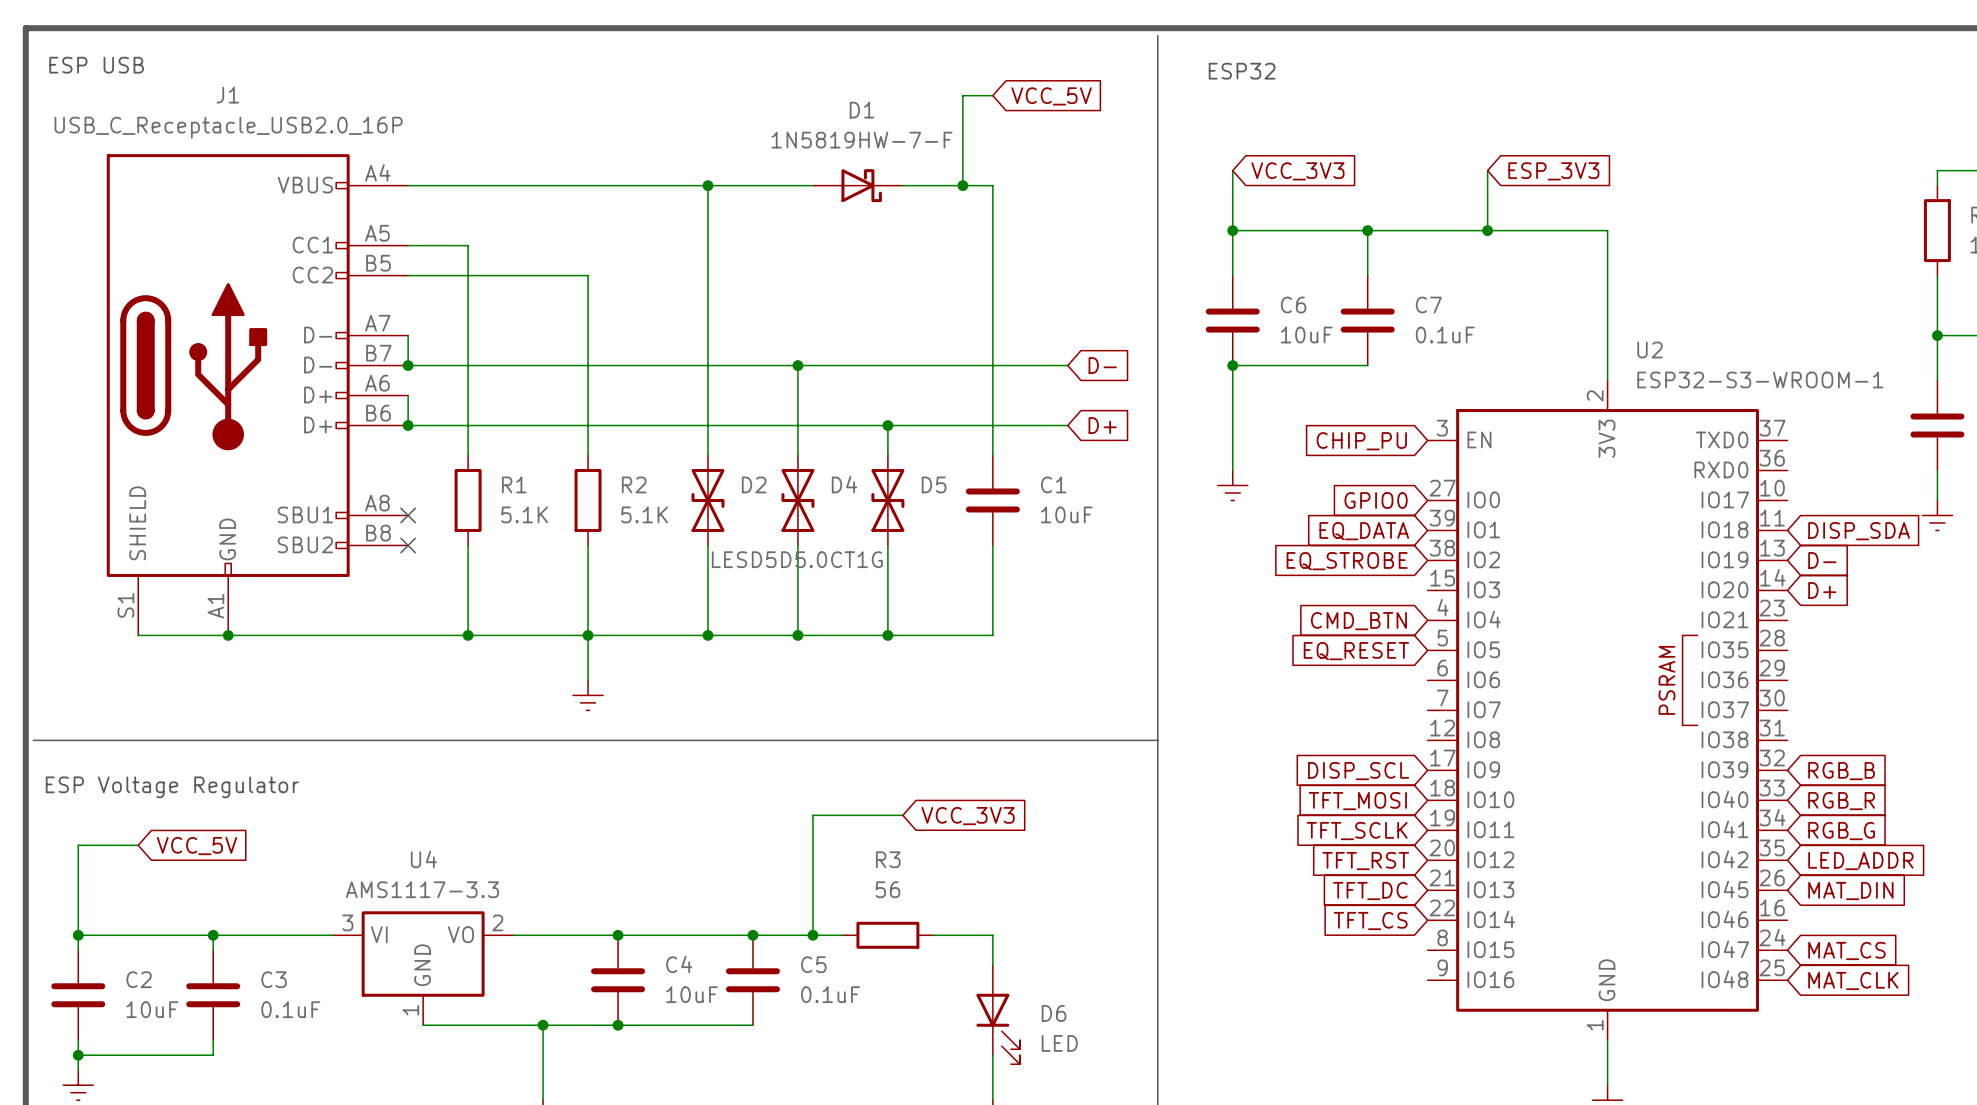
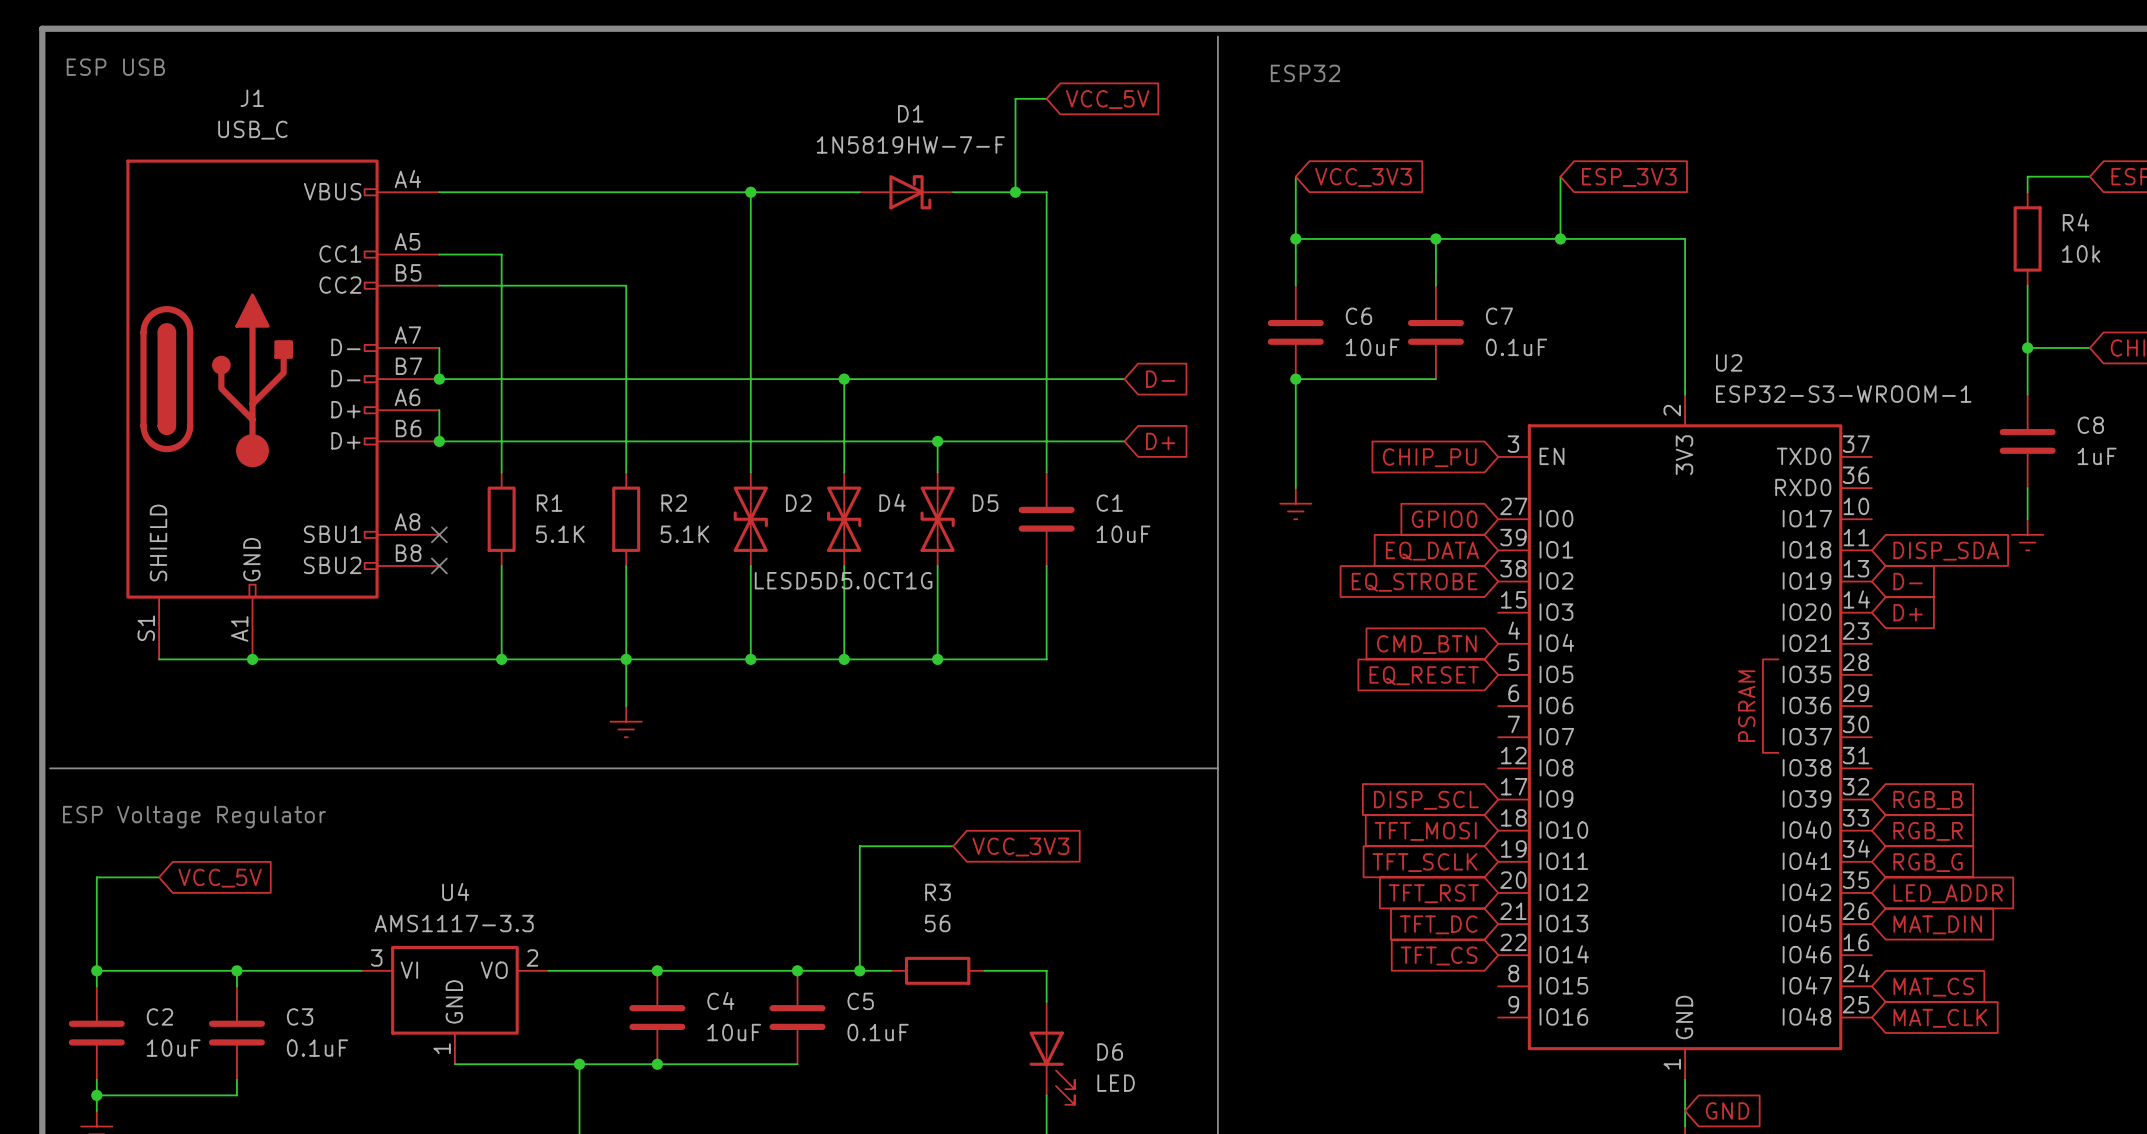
J1 value: USB_C_Receptacle_USB2.0_16P (228, 127) -> USB_C (252, 130)
global label: none -> GND (1727, 1110)

